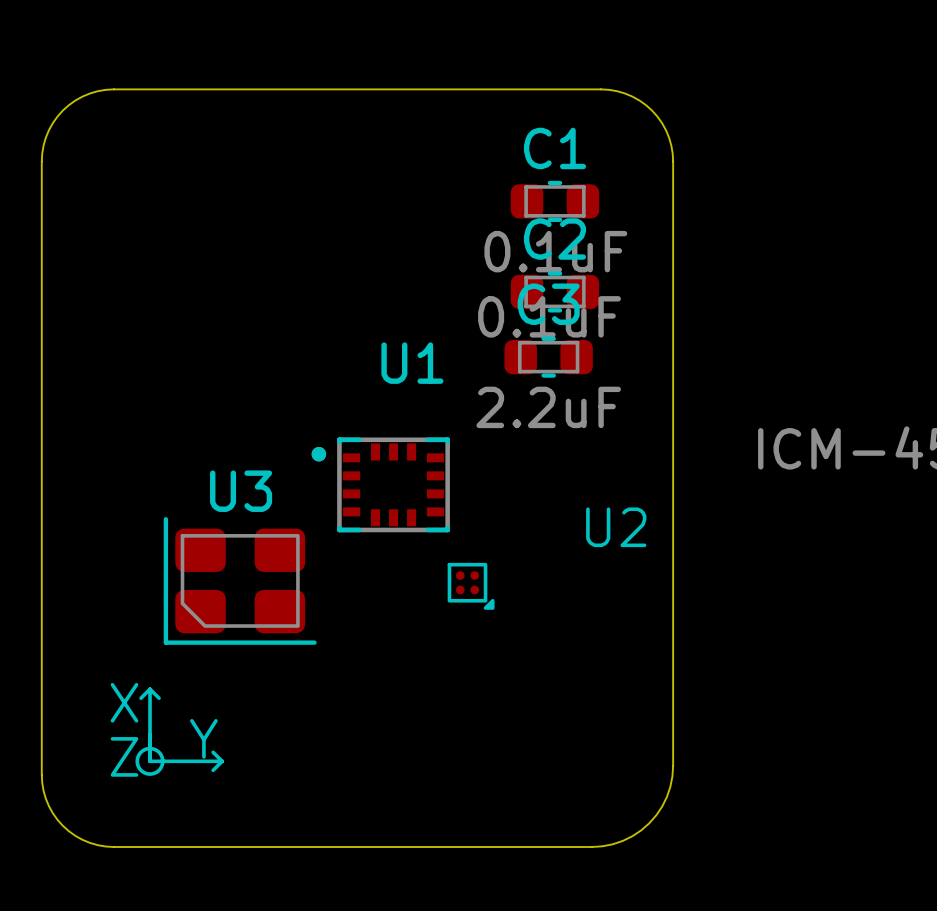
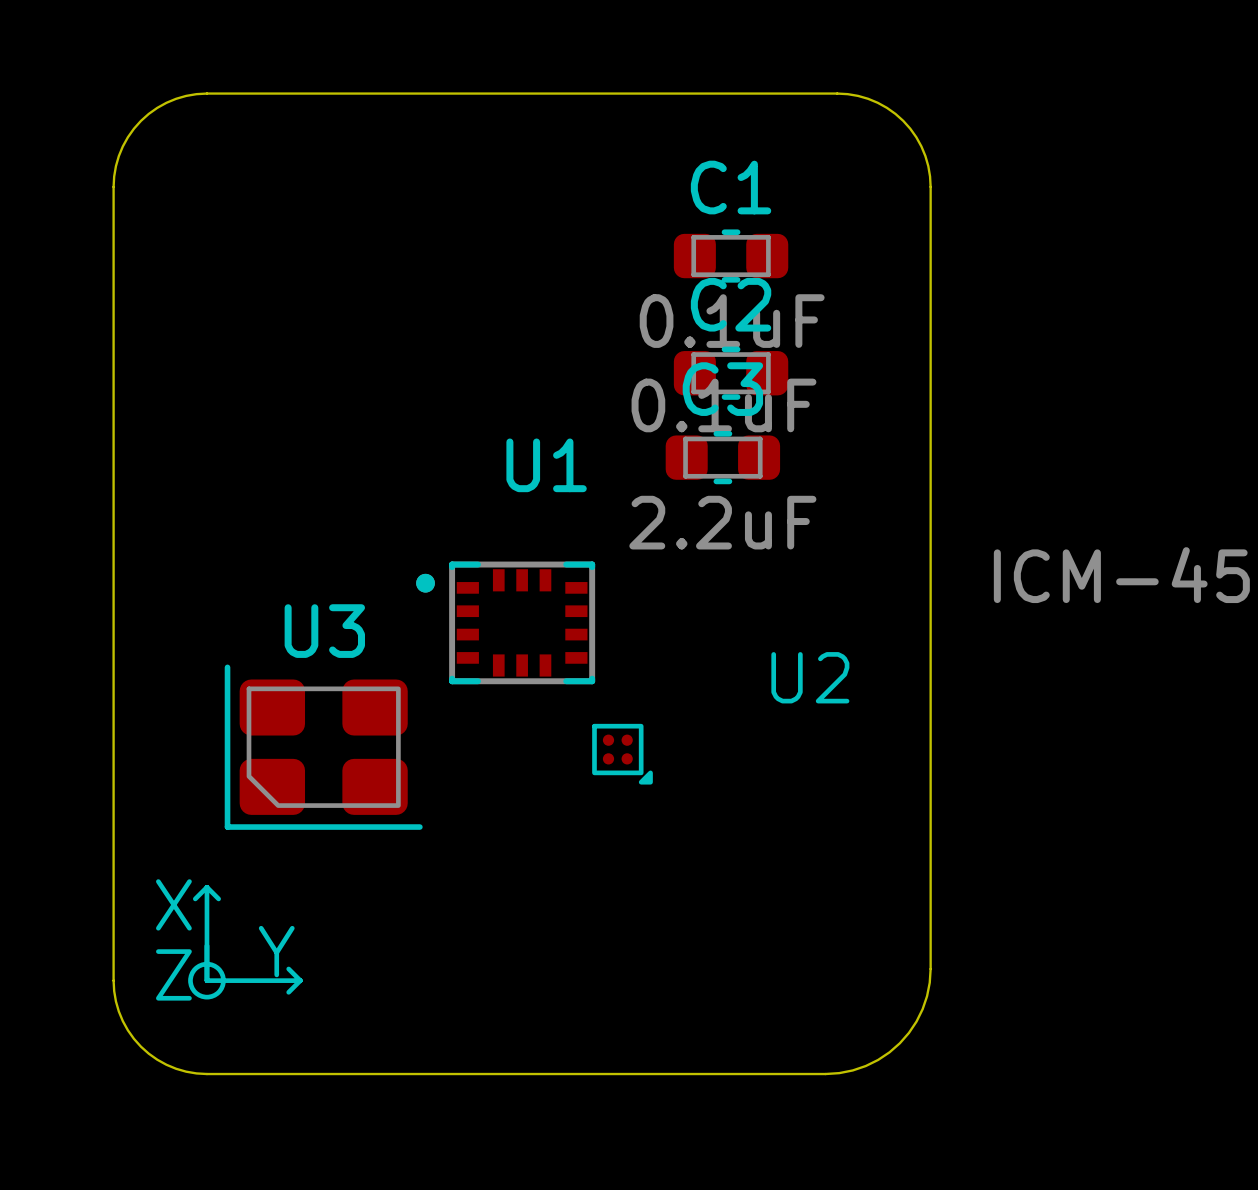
board edge: (113, 89) (600, 89) (617, 91) (632, 96) (645, 105) (657, 116) (669, 137) (673, 161) (673, 765) (666, 796) (656, 815) (641, 830) (623, 840) (591, 847) (113, 847) (97, 845) (82, 839) (68, 831) (57, 819) (45, 798) (41, 774) (42, 153) (48, 130) (62, 110) (82, 96) (97, 91) (113, 89) -> (206, 93) (837, 93) (858, 95) (877, 102) (895, 113) (910, 128) (925, 156) (930, 186) (930, 968) (927, 996) (922, 1009) (908, 1032) (889, 1052) (865, 1066) (852, 1070) (825, 1074) (206, 1074) (186, 1071) (166, 1064) (148, 1053) (133, 1038) (118, 1011) (113, 980) (114, 176) (118, 156) (127, 137) (148, 113) (176, 98) (206, 93)

